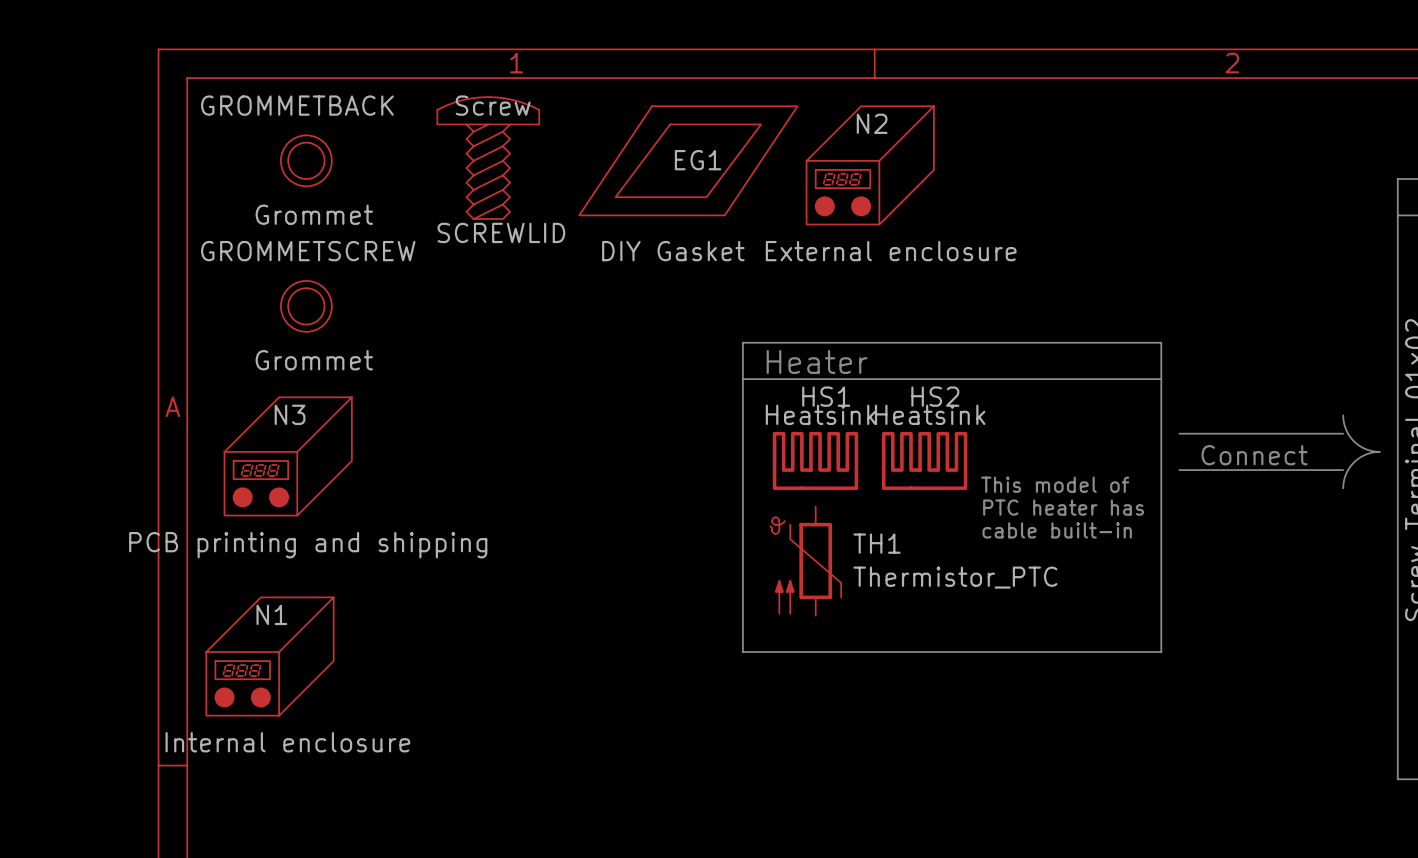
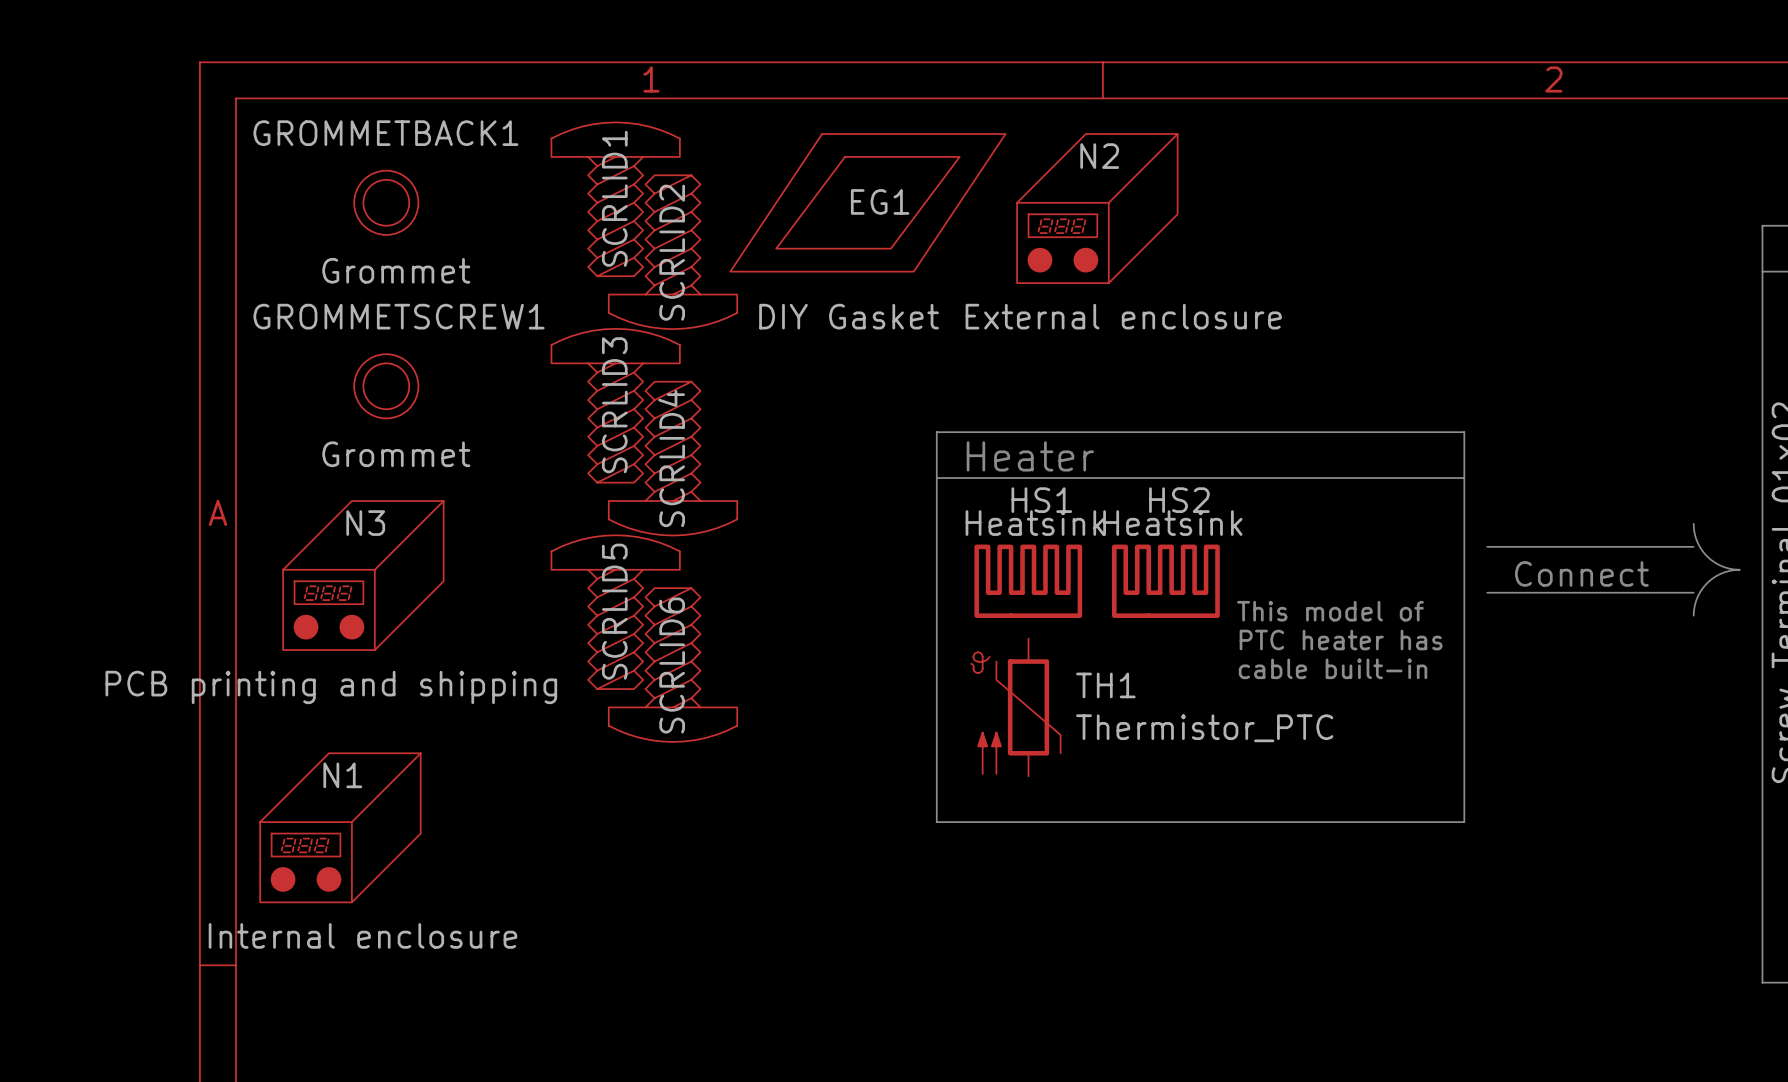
GROMMETBACK name: GROMMETBACK (297, 105) -> GROMMETBACK1 (385, 133)
SCREWLID value: Screw (493, 105) -> none
SCRLID2: none -> (673, 252)
SCREWLID name: SCREWLID (501, 232) -> SCRLID1 (614, 198)
GROMMETSCREW name: GROMMETSCREW (308, 251) -> GROMMETSCREW1 (399, 316)
SCRLID3: none -> (615, 405)
SCRLID4: none -> (673, 458)
SCRLID5: none -> (615, 612)
SCRLID6: none -> (673, 665)
N3 value position: PCB printing and shipping (308, 545) -> PCB printing and shipping (331, 687)

